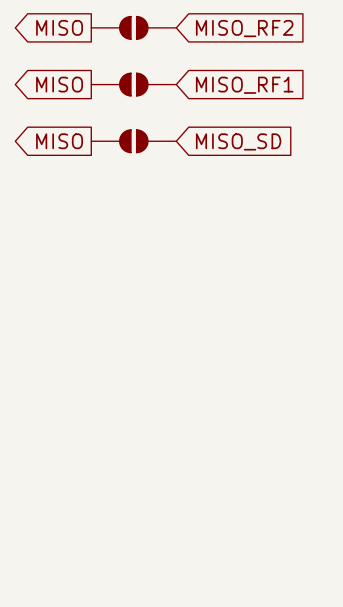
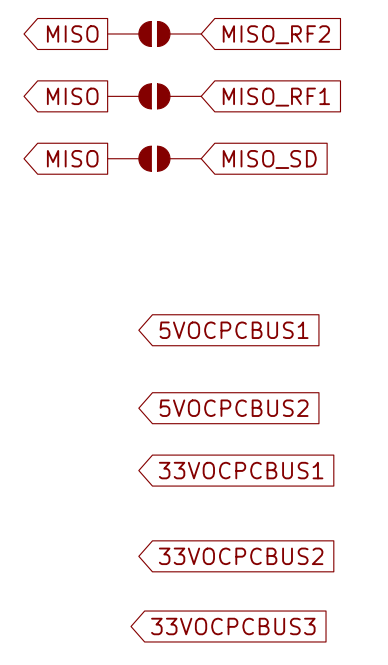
global label: none -> 5VOCPCBUS1 (234, 330)
global label: none -> 5VOCPCBUS2 (234, 408)
global label: none -> 33VOCPCBUS1 (241, 470)
global label: none -> 33VOCPCBUS2 (241, 556)
global label: none -> 33VOCPCBUS3 (233, 626)

